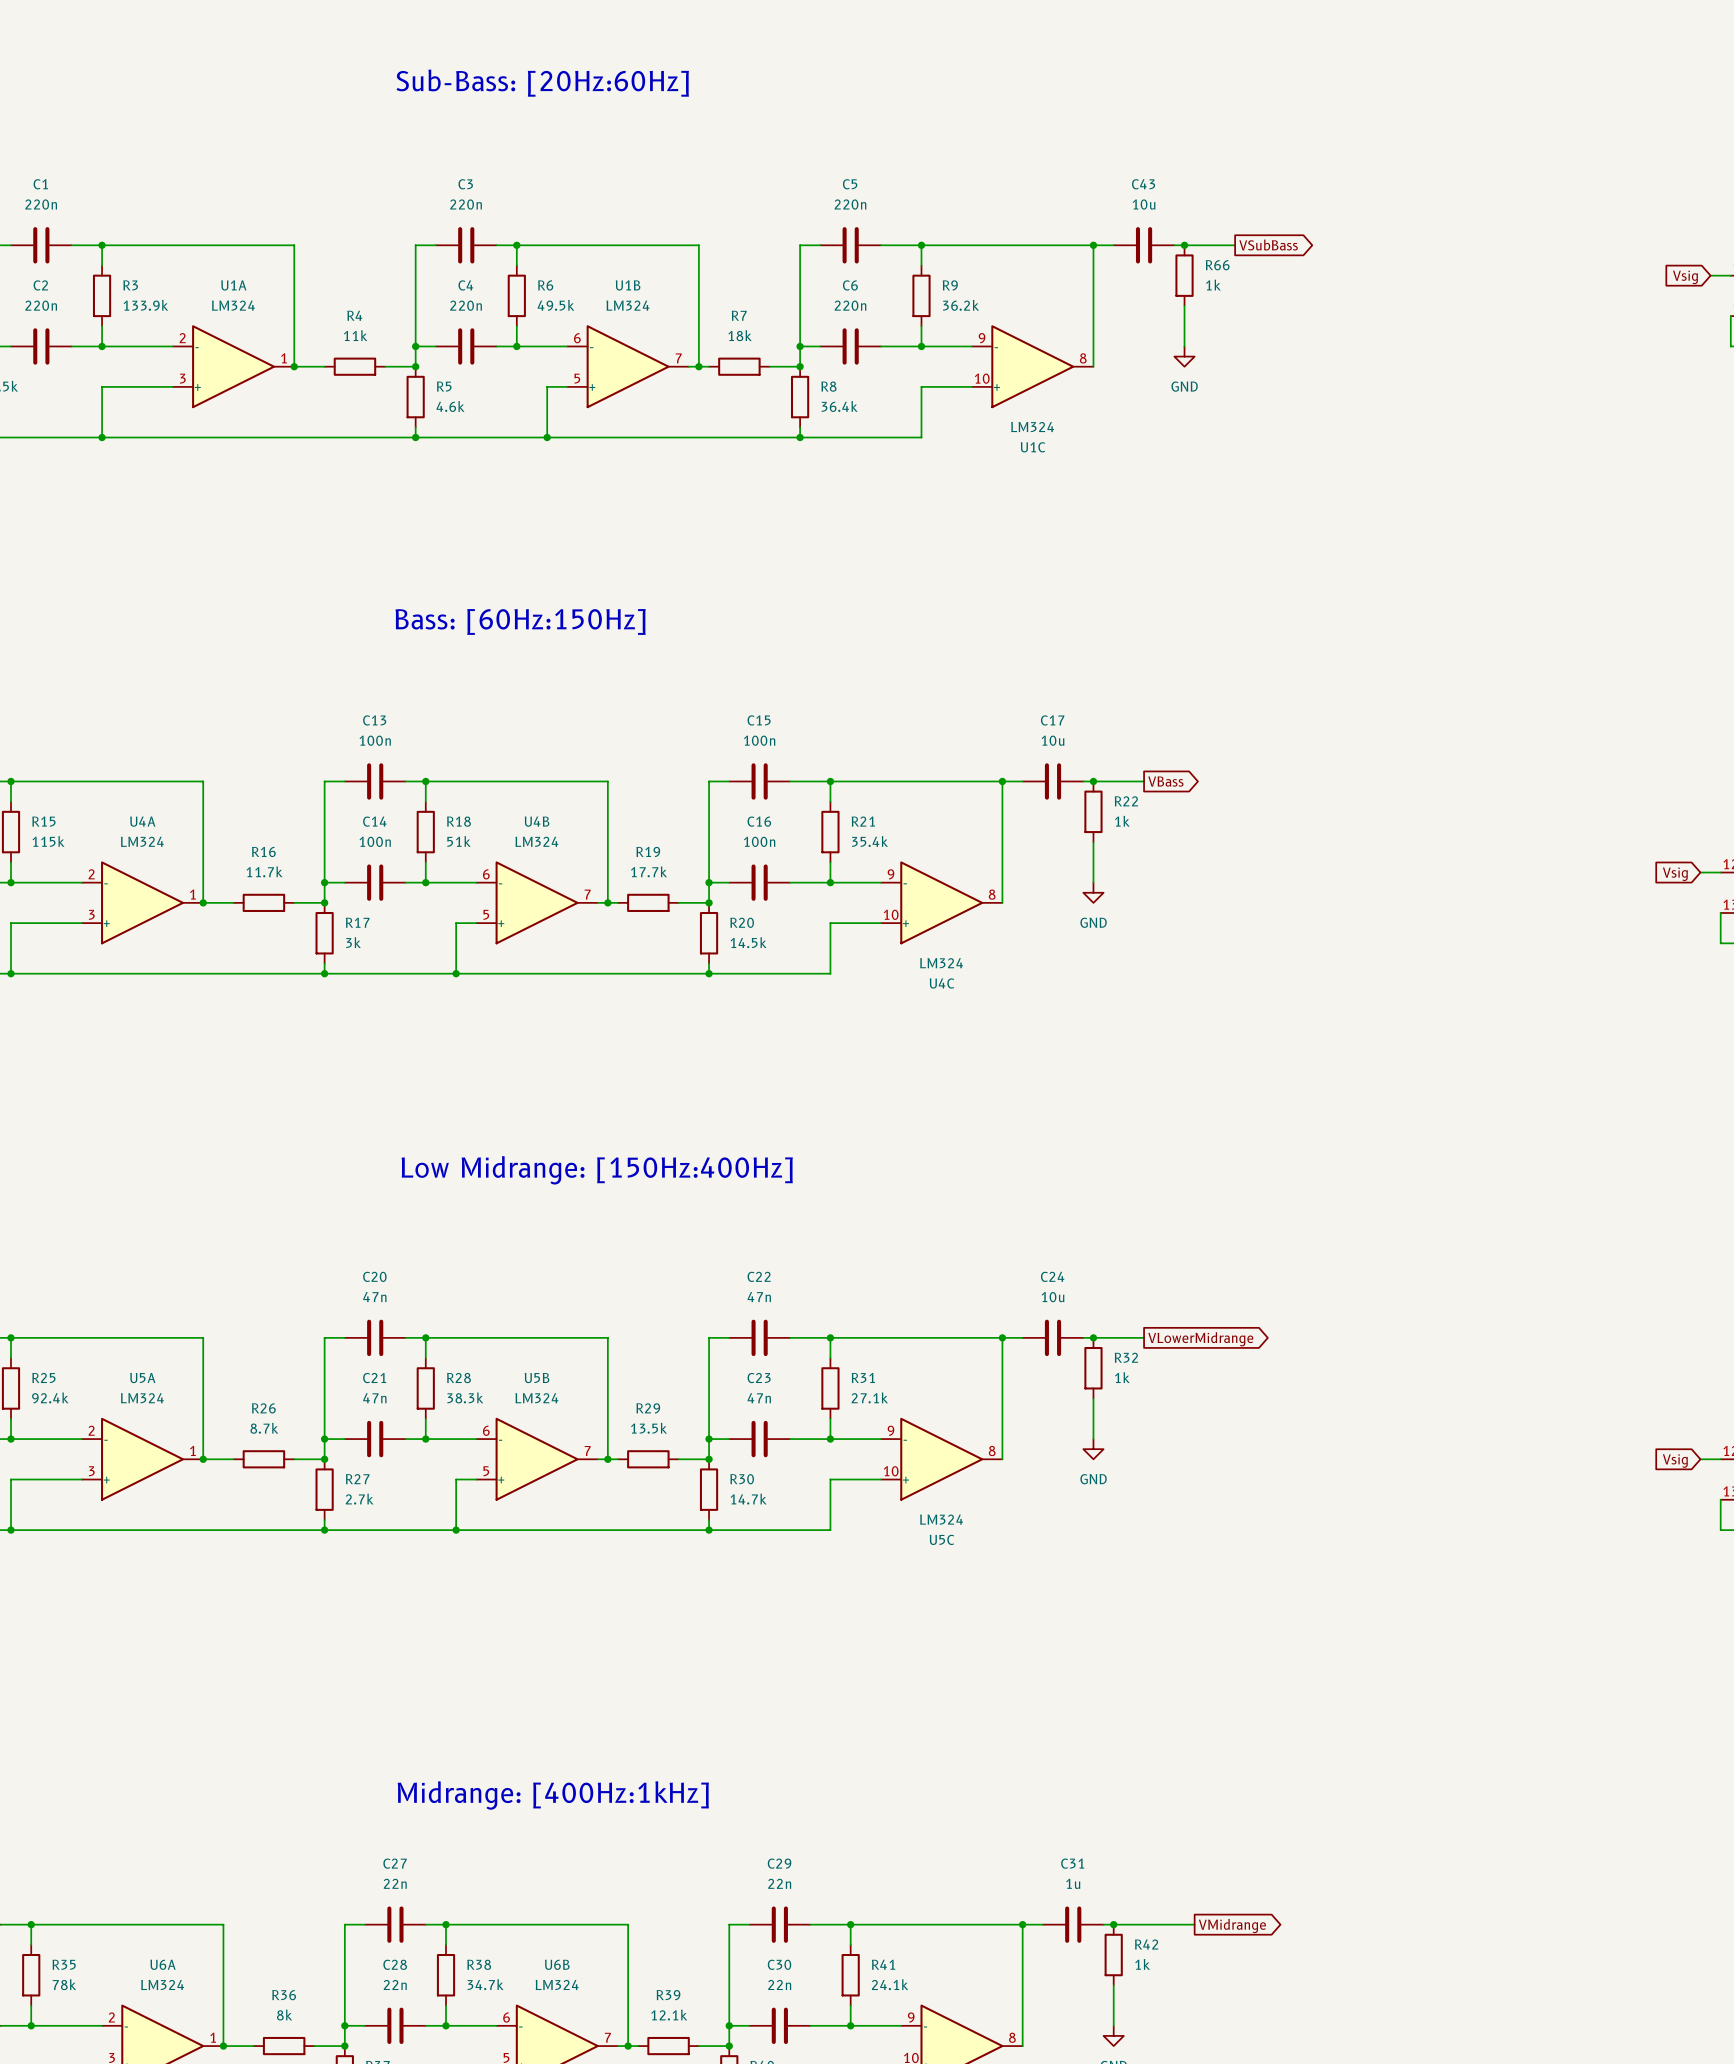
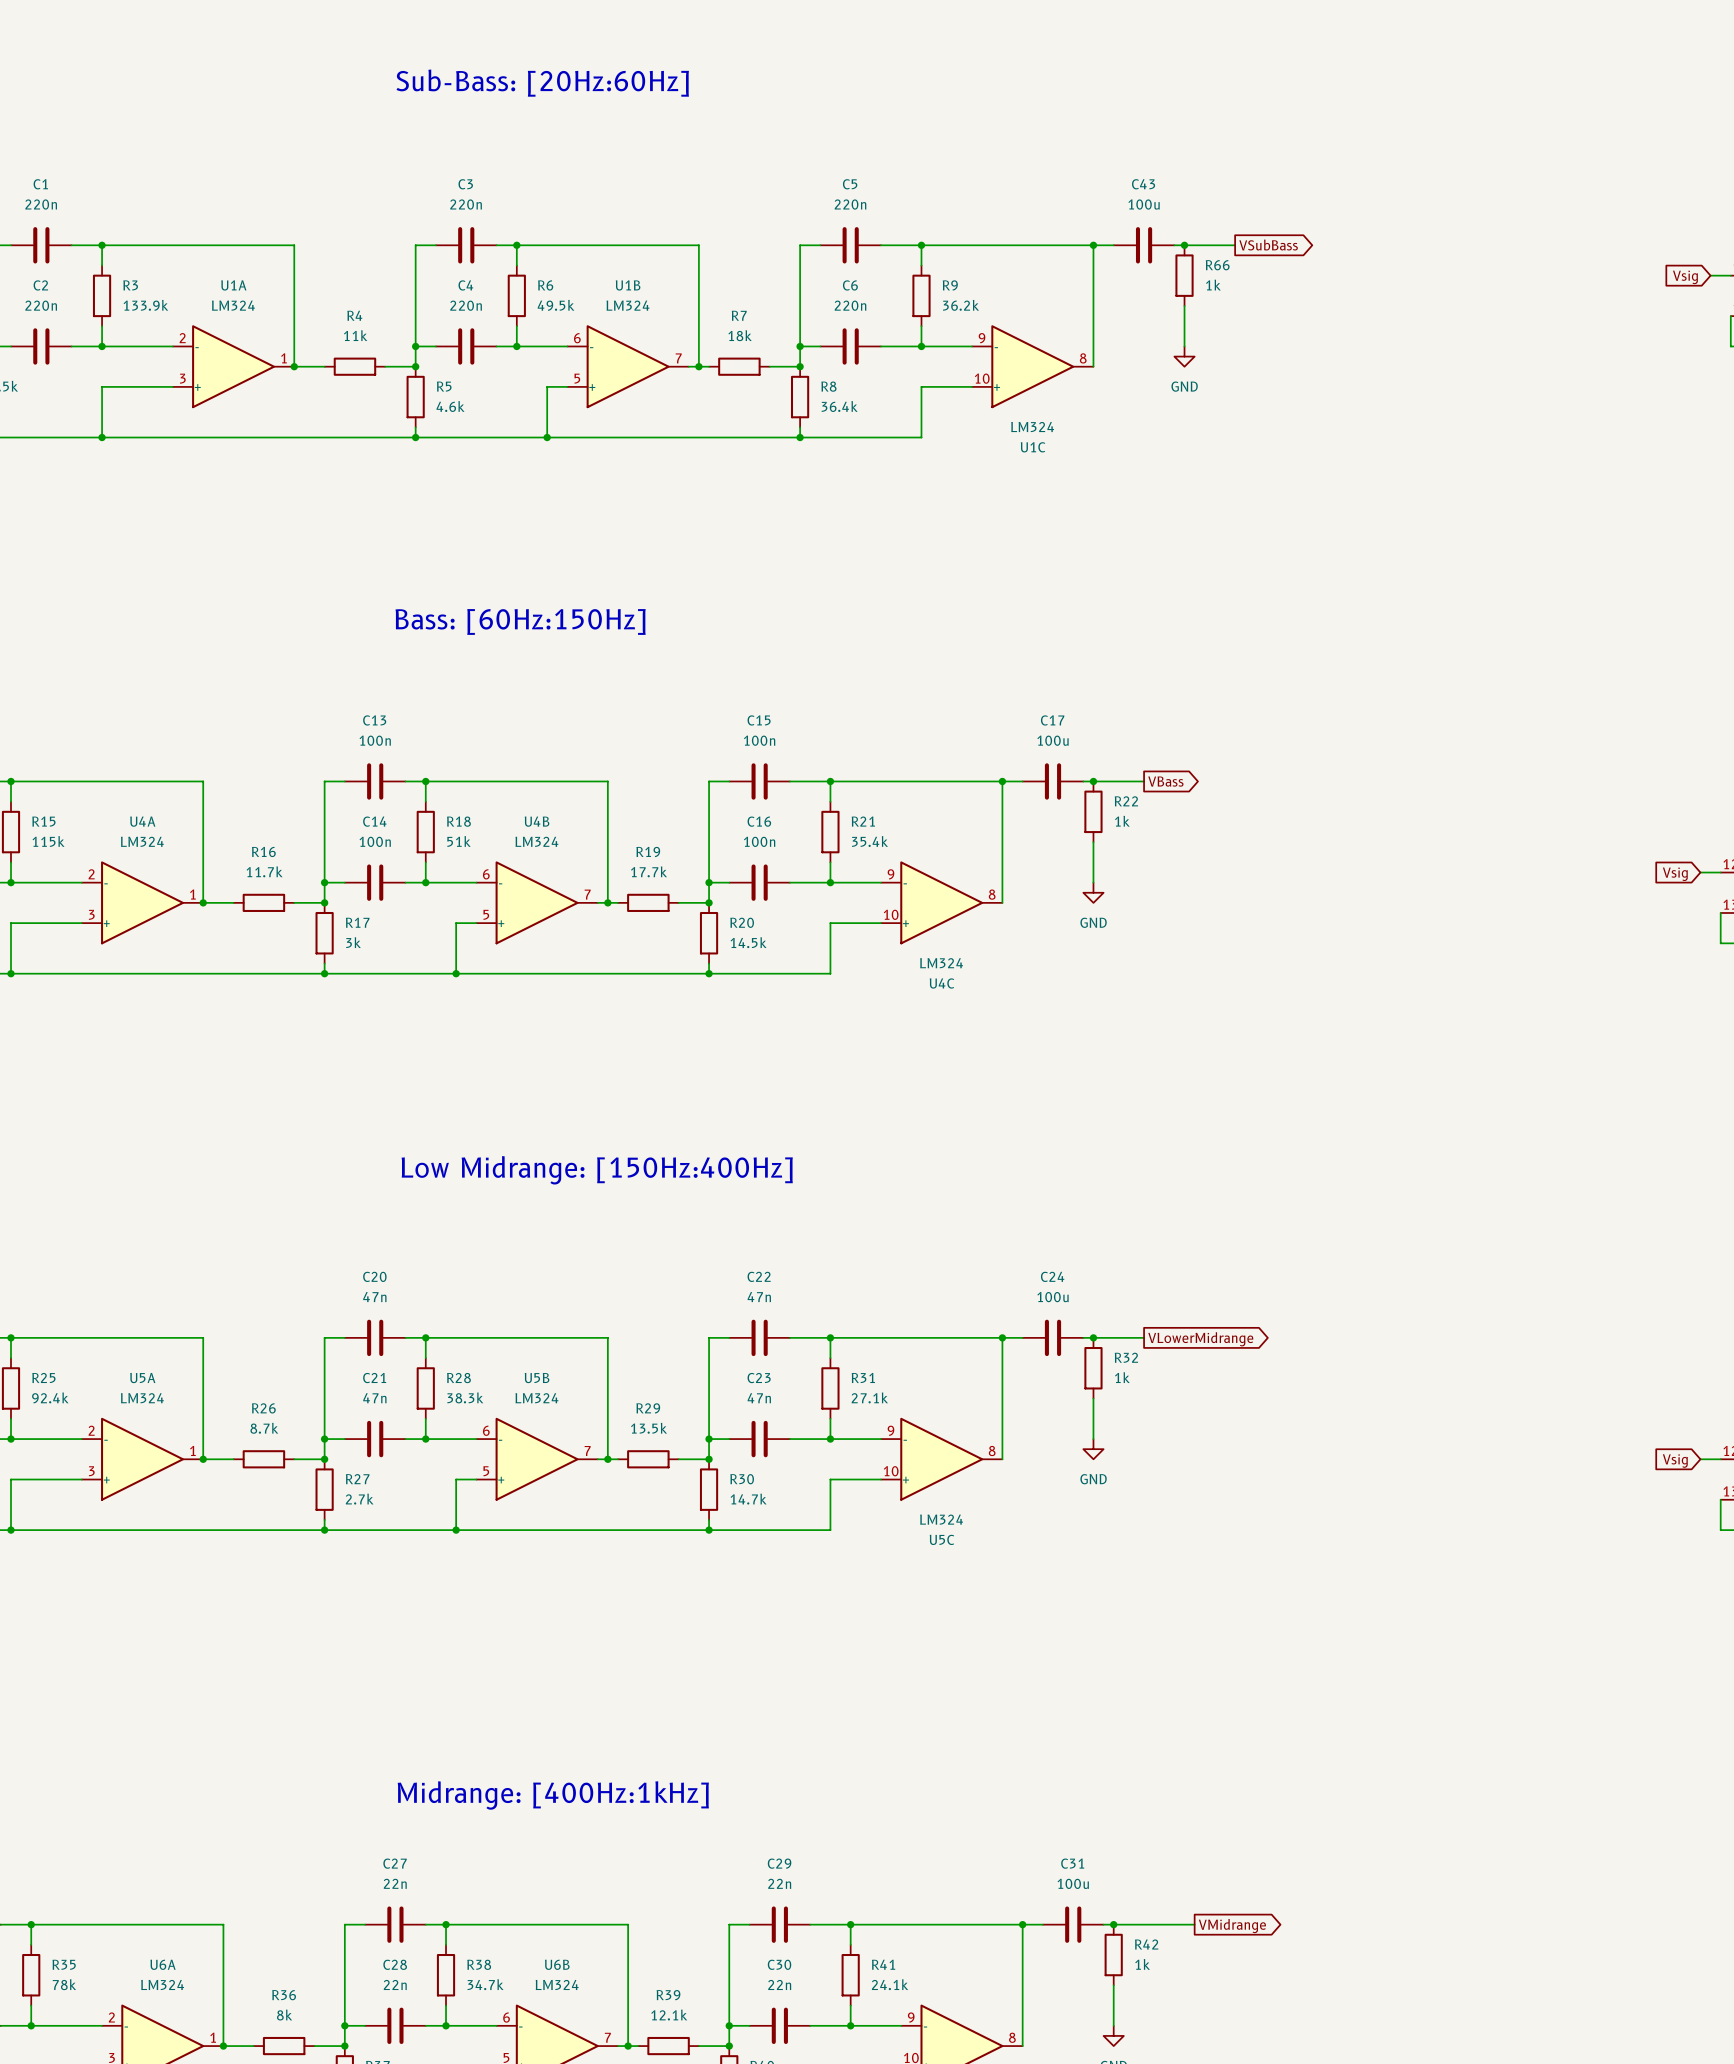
C43 value: 10u (1144, 204) -> 100u (1144, 204)
C17 value: 10u (1052, 740) -> 100u (1052, 740)
C24 value: 10u (1052, 1297) -> 100u (1052, 1297)
C31 value: 1u (1073, 1883) -> 100u (1073, 1883)

